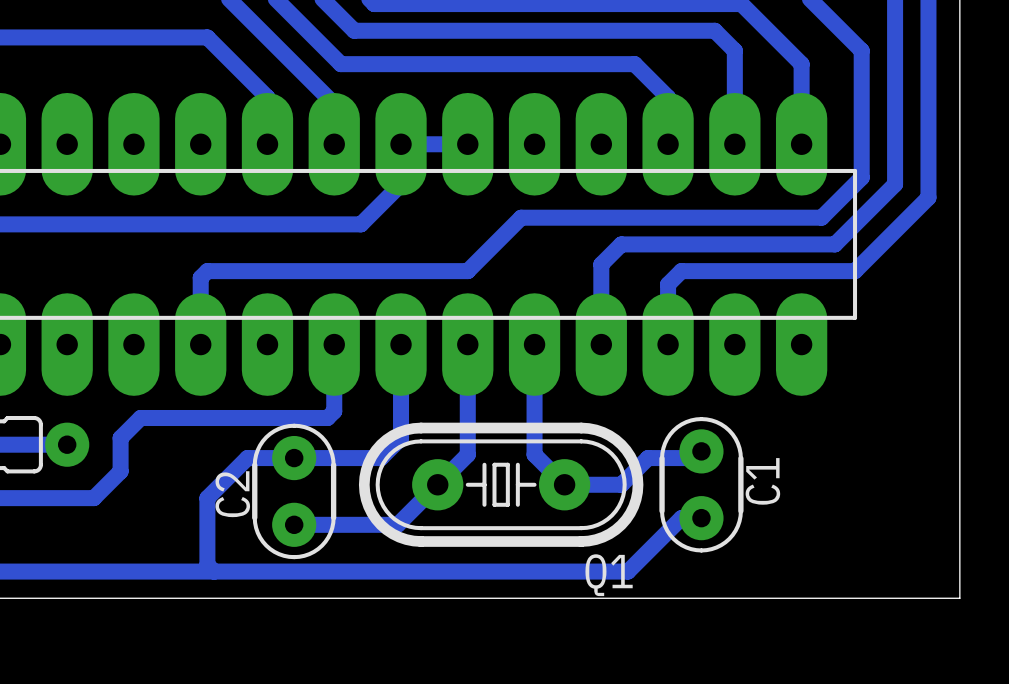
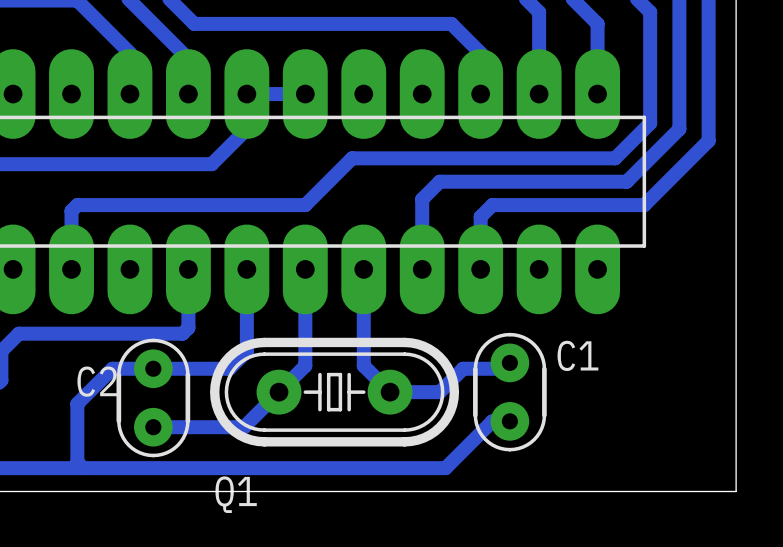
C1 name rotation: 0° (762, 481) -> 90° clockwise (577, 355)
C2 name rotation: 0° (232, 494) -> 90° clockwise (97, 381)
Q1 name position: Q1 (609, 575) -> Q1 (236, 494)

